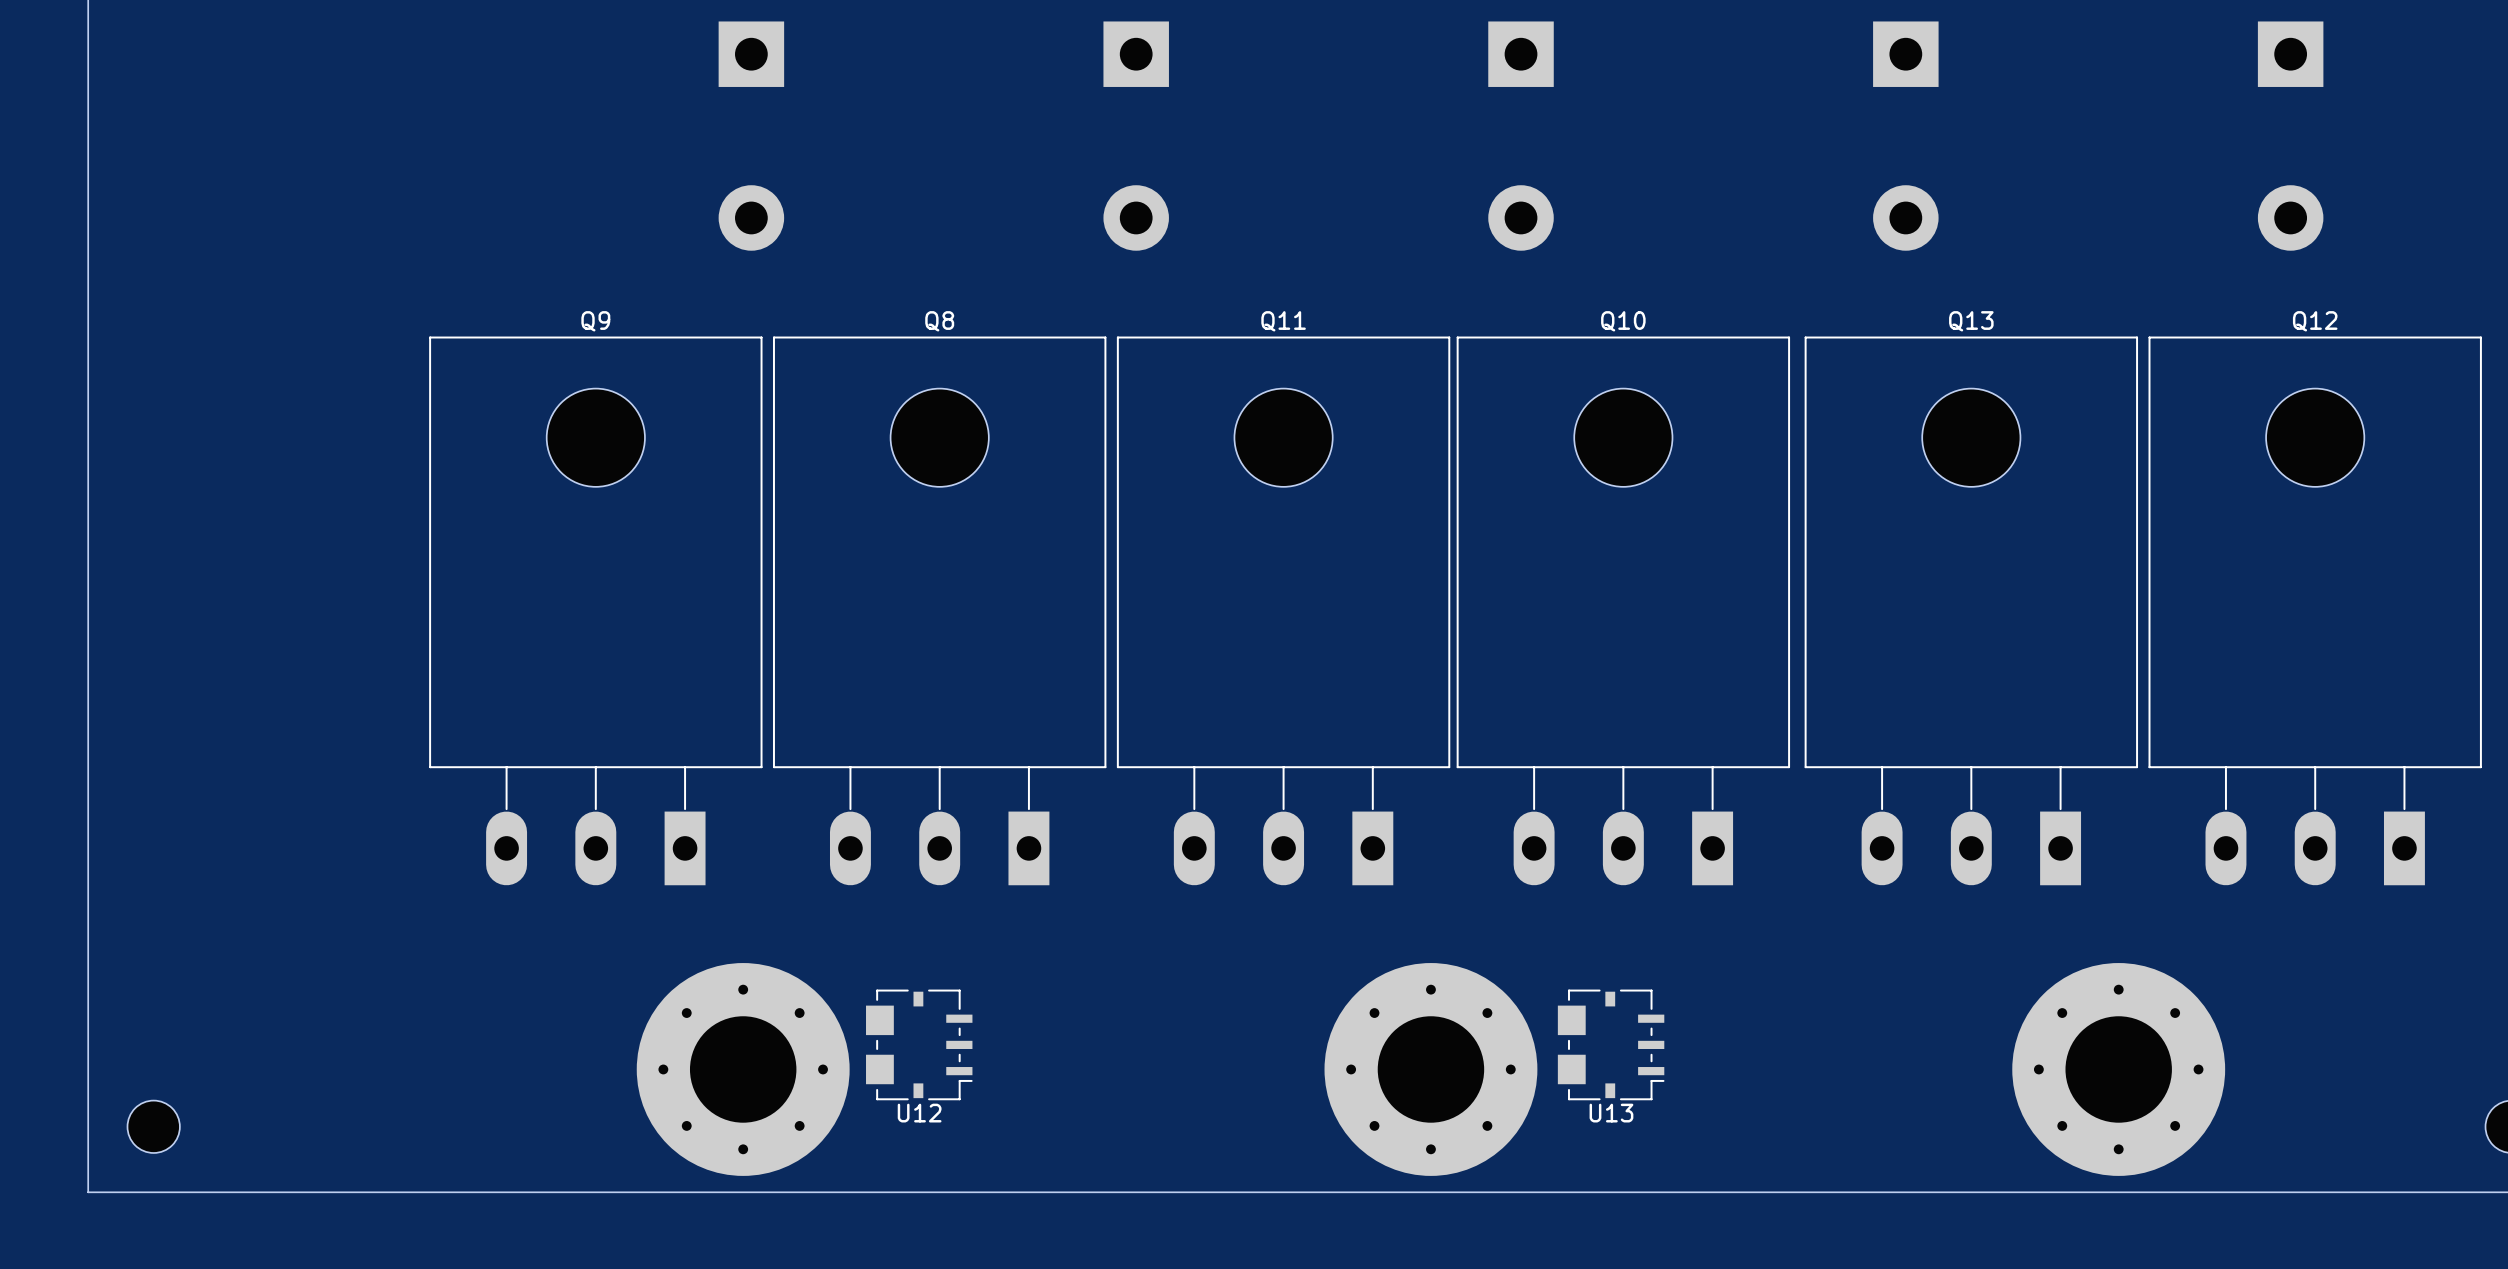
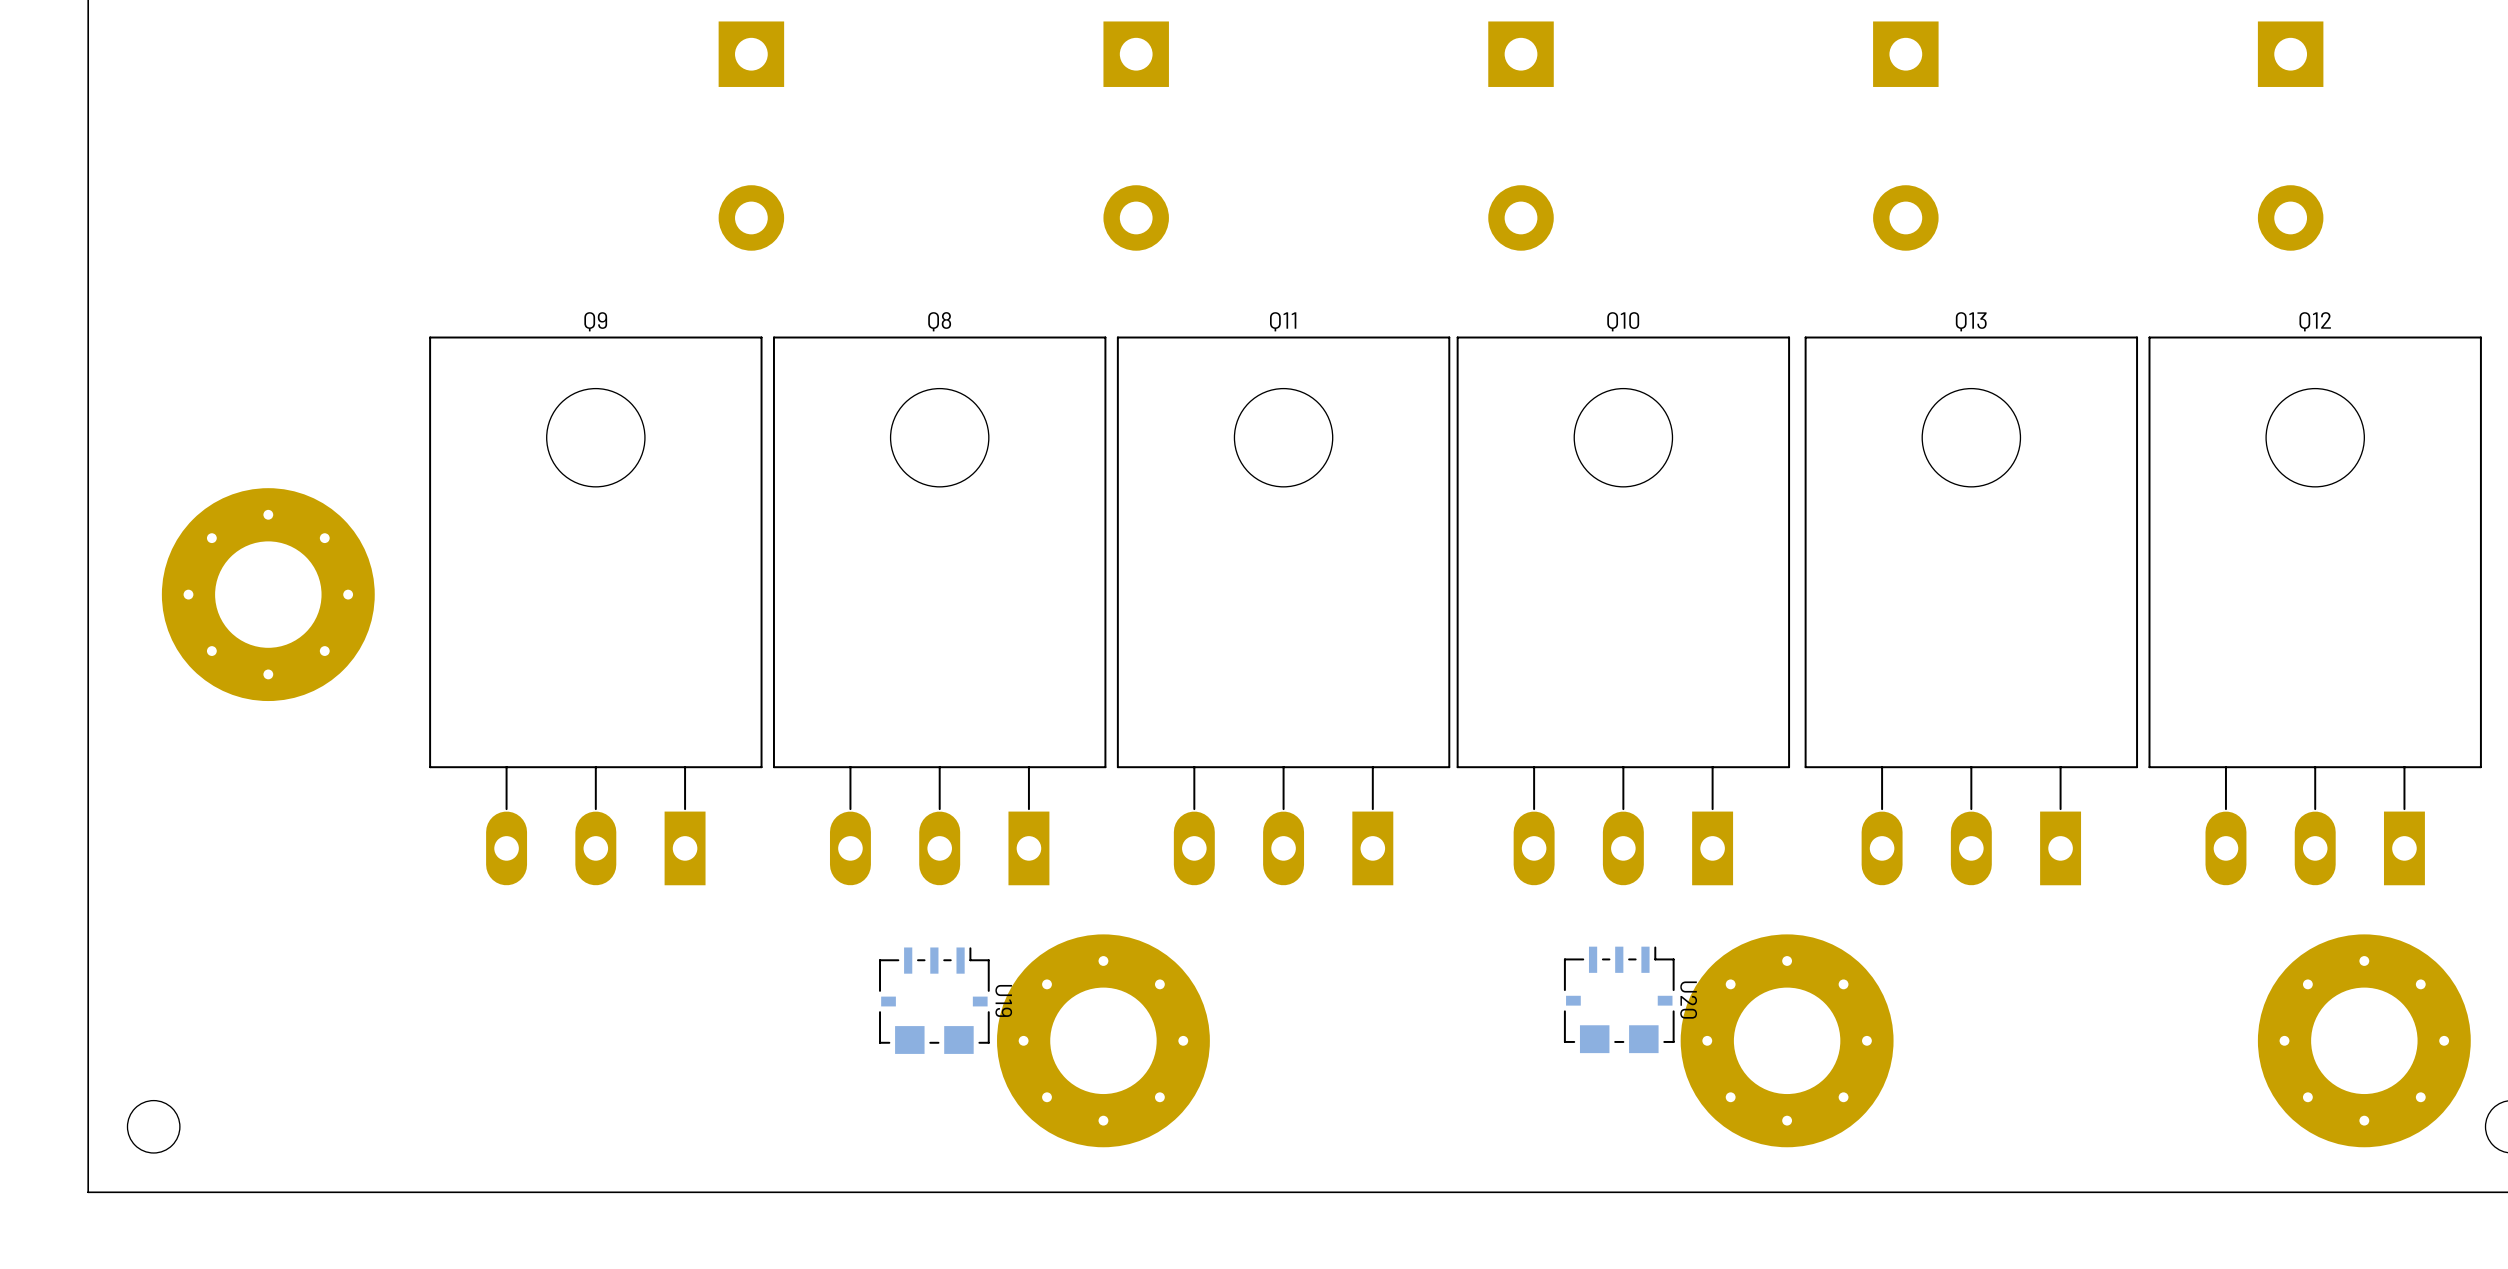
part: none -> (268, 594)
U20: none -> (1619, 999)
U19: none -> (934, 1000)
part: none -> (1103, 1040)
part: none -> (1787, 1040)
part: none -> (2364, 1040)
U12: (919, 1044) -> none
U13: (1611, 1044) -> none
part: (743, 1069) -> none
part: (1430, 1069) -> none
part: (2118, 1069) -> none

